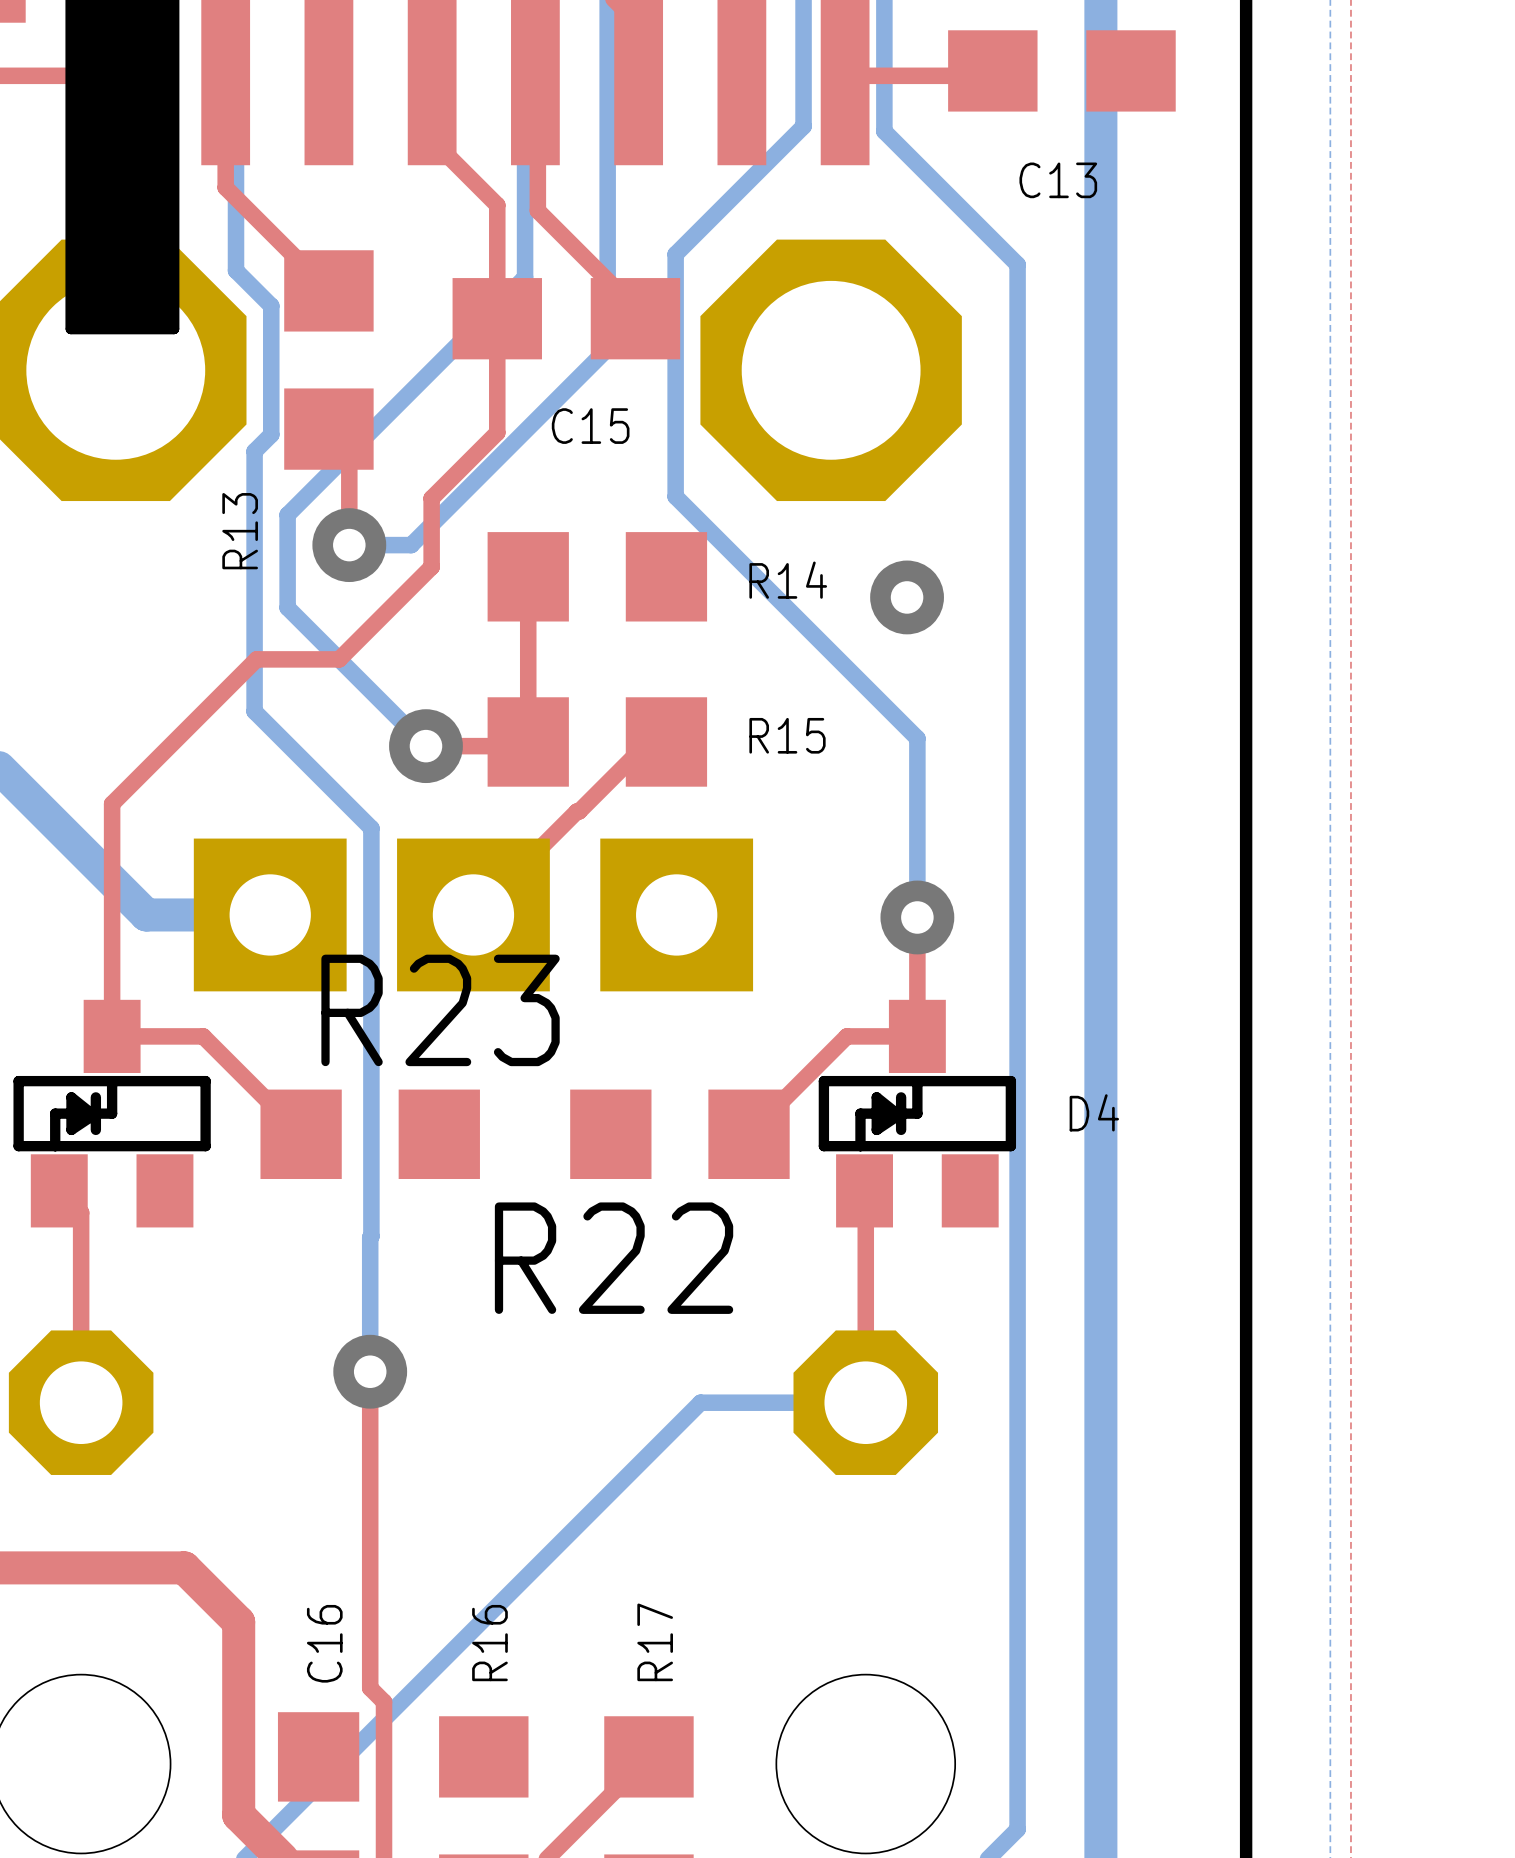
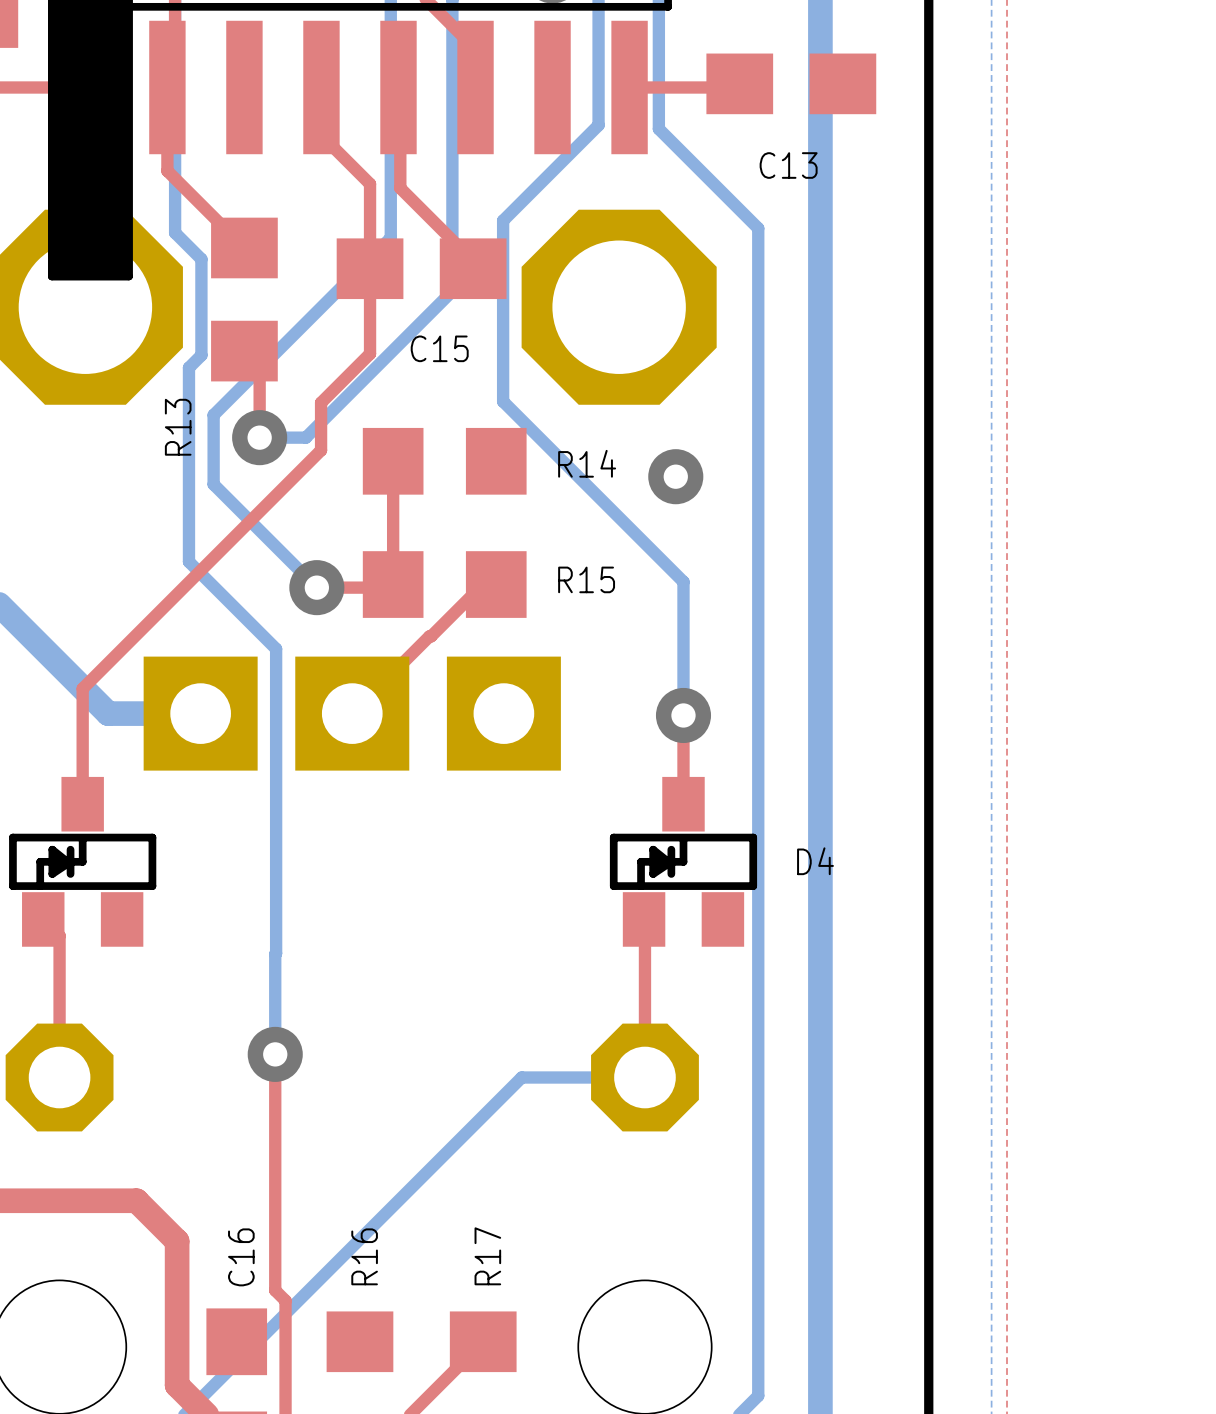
top track: (431, 562) (431, 566) (339, 659) (256, 659) (112, 803) (112, 881) -> (321, 450) (82, 688)
top track: (112, 1036) (203, 1036) (301, 1134) -> none
top track: (917, 1036) (846, 1036) (749, 1134) -> none
R23: (370, 1134) -> none
R22: (679, 1134) -> none

